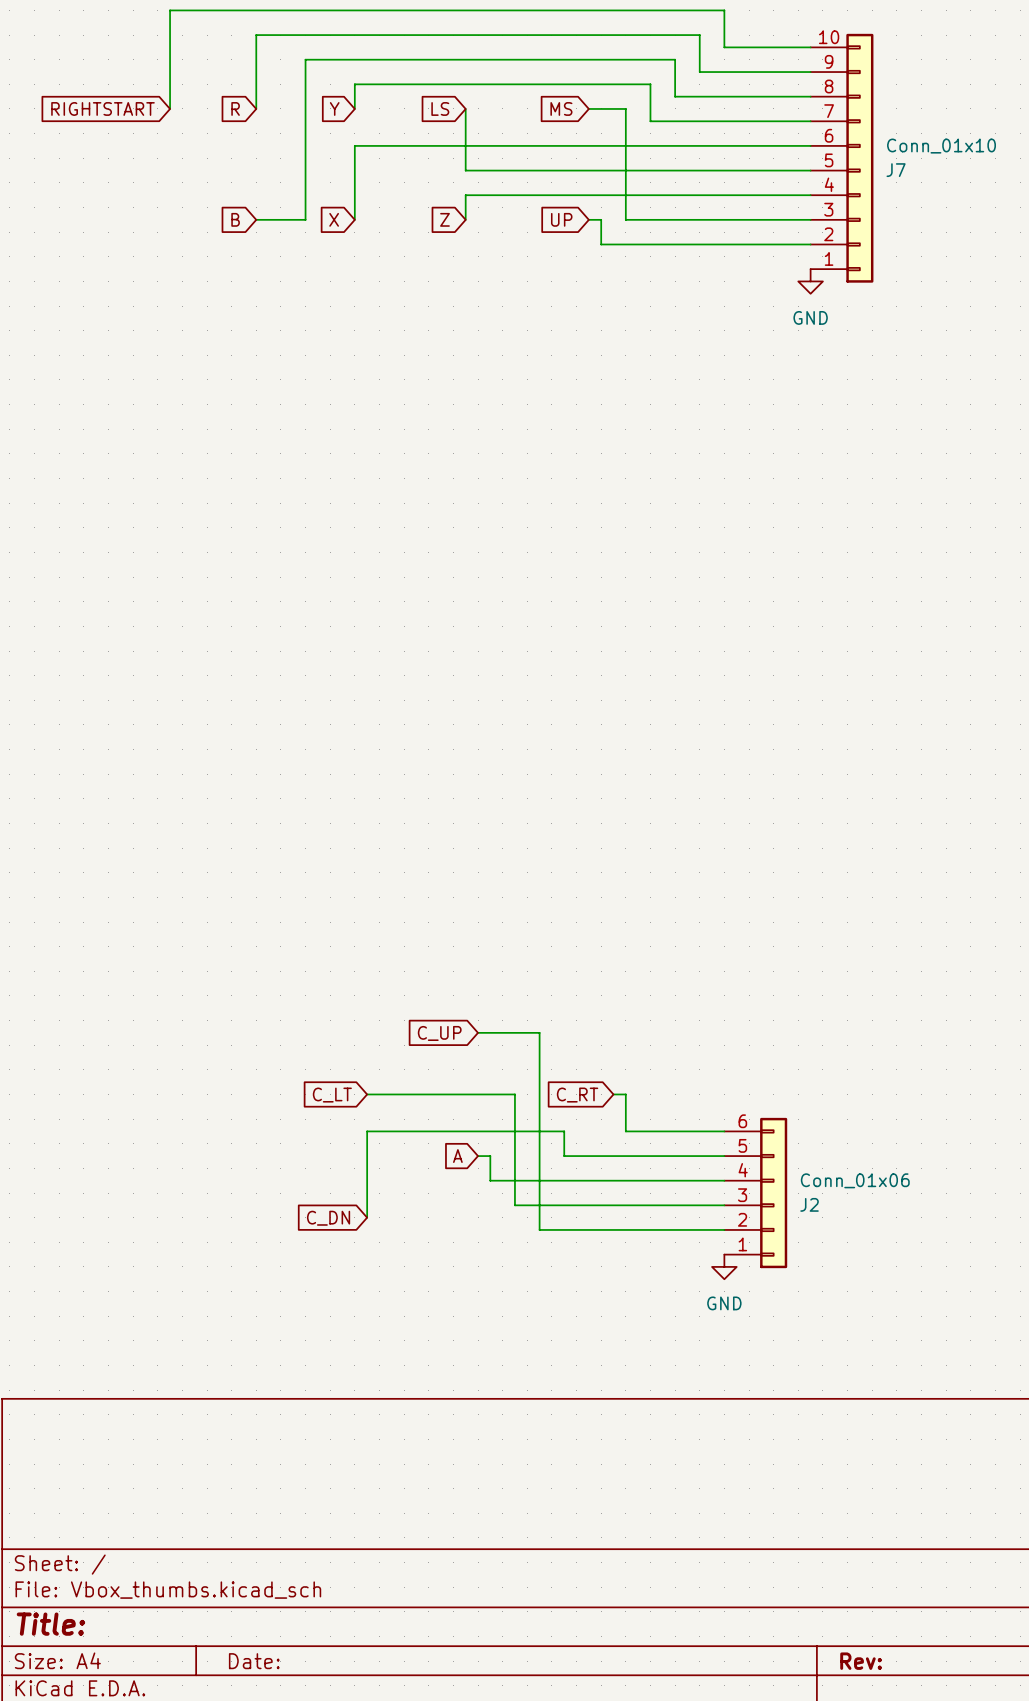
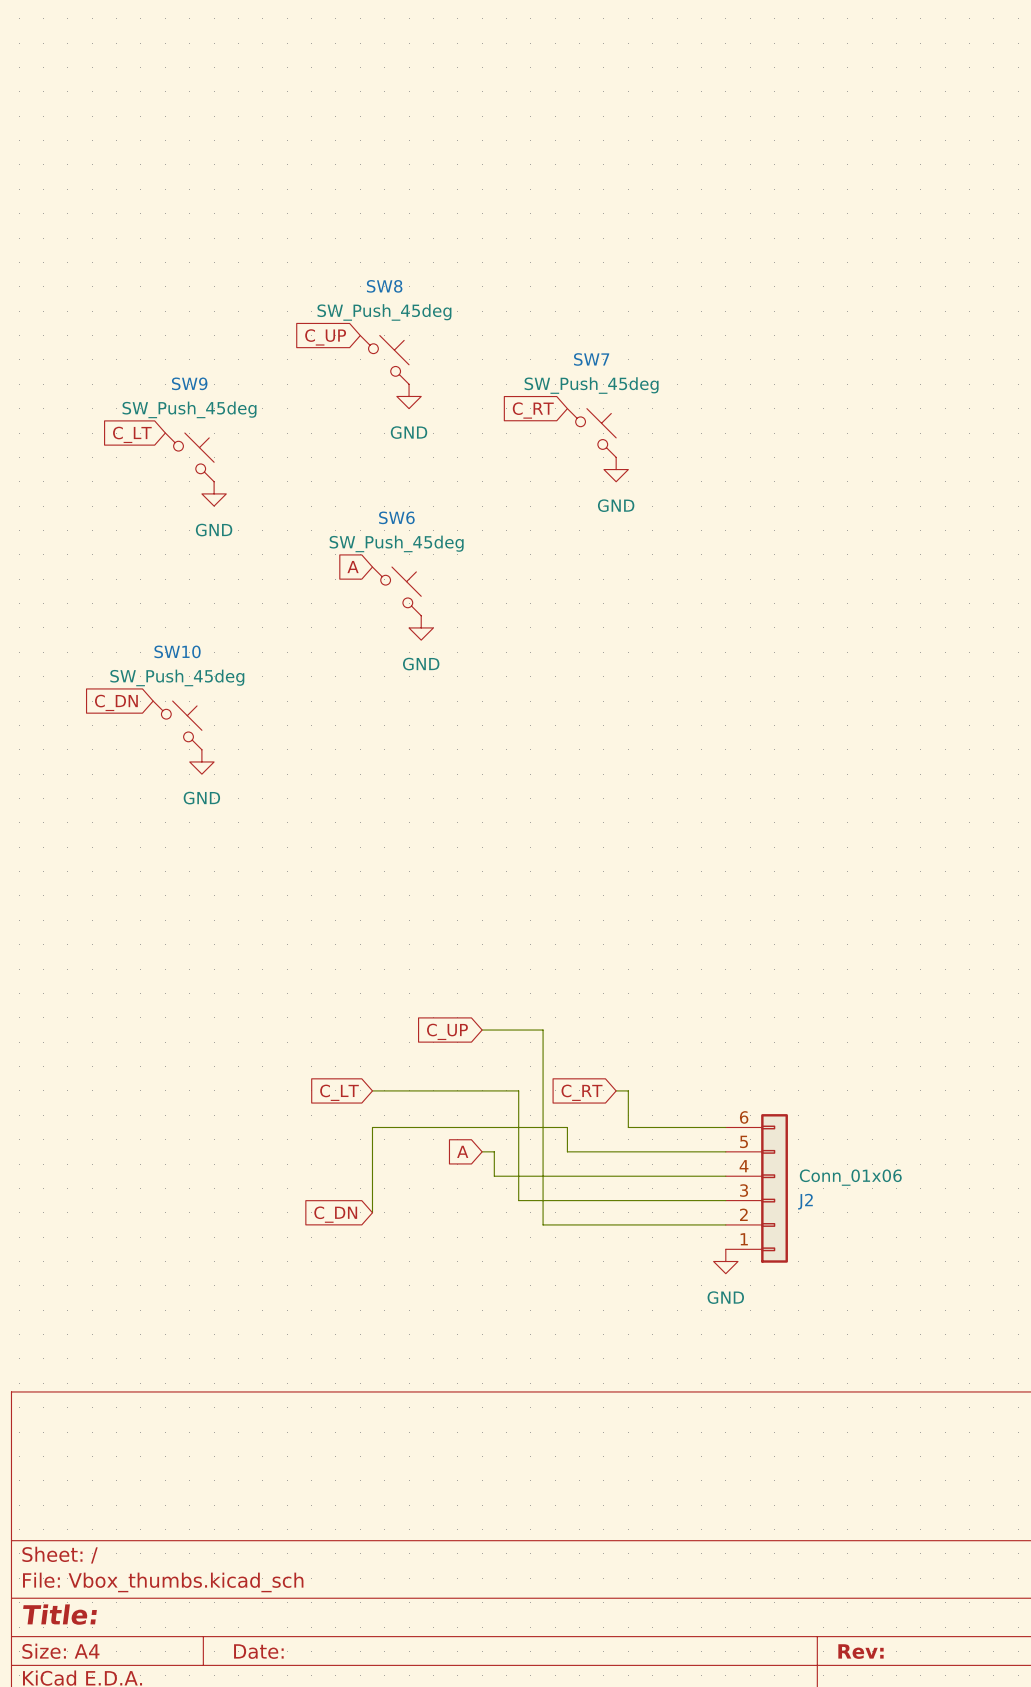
wire: (810, 47) (724, 47) (724, 10) (170, 10) (170, 108) -> none
wire: (810, 72) (699, 72) (699, 35) (256, 35) (256, 108) -> none
wire: (810, 96) (675, 96) (675, 59) (305, 59) (305, 219) (256, 219) -> none
global label: RIGHTSTART (103, 108) -> none
global label: R (235, 108) -> none
global label: Y (334, 108) -> none
wire: (354, 108) (354, 84) (650, 84) (650, 121) (810, 121) -> none
global label: LS (440, 108) -> none
wire: (465, 108) (465, 170) (810, 170) -> none
global label: MS (561, 108) -> none
wire: (588, 108) (625, 108) (625, 219) (810, 219) -> none
wire: (810, 145) (354, 145) (354, 219) -> none
J7: Conn_01x10 (842, 158) -> none
wire: (810, 195) (465, 195) (465, 219) -> none
global label: B (235, 219) -> none
global label: X (334, 219) -> none
global label: Z (444, 219) -> none
global label: UP (561, 219) -> none
wire: (588, 219) (601, 219) (601, 244) (810, 244) -> none
power symbol: GND (810, 281) -> none
global label: none -> C_UP (325, 337)
SW8: none -> SW_Push_45deg (384, 359)
power symbol: none -> GND (409, 396)
global label: none -> C_RT (533, 410)
global label: none -> C_LT (132, 434)
SW7: none -> SW_Push_45deg (591, 433)
SW9: none -> SW_Push_45deg (189, 457)
power symbol: none -> GND (616, 469)
power symbol: none -> GND (214, 493)
global label: none -> A (353, 567)
SW6: none -> SW_Push_45deg (396, 591)
power symbol: none -> GND (421, 627)
global label: none -> C_DN (116, 702)
SW10: none -> SW_Push_45deg (177, 725)
power symbol: none -> GND (201, 761)

